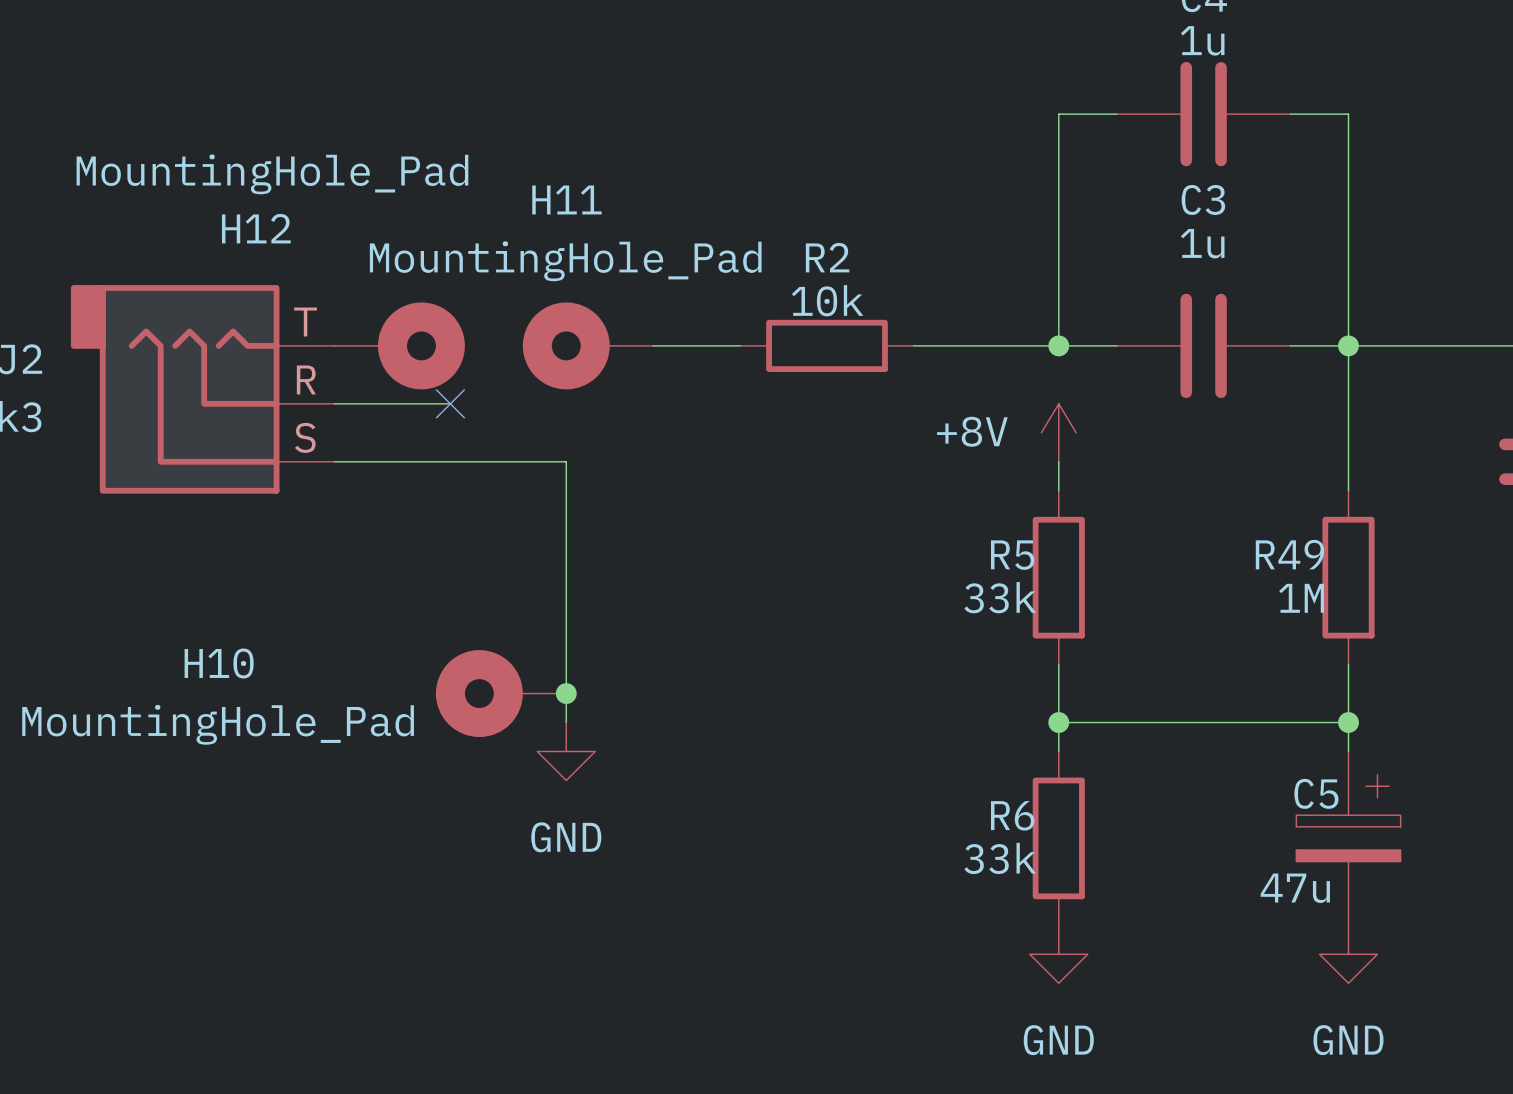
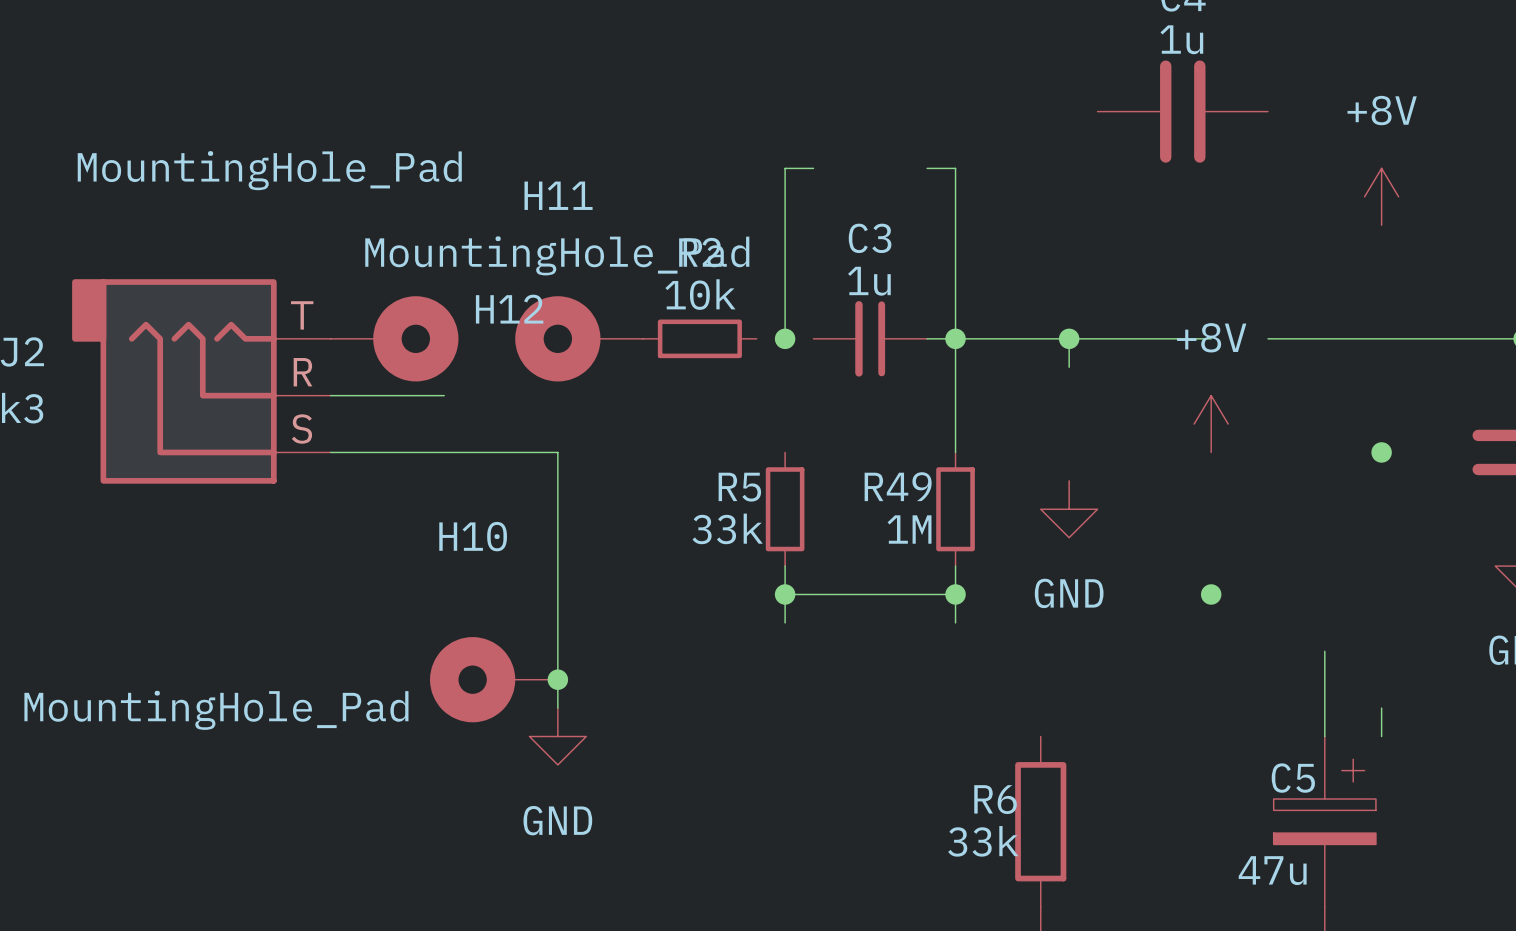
wire: (1116, 114) (1058, 114) (1058, 345) -> none
wire: (1290, 114) (1348, 114) (1348, 490) -> none
wire: none -> (813, 168) (785, 168) (785, 338)
wire: none -> (927, 168) (955, 168) (955, 452)
power symbol: none -> +8V (1381, 196)
H12 name position: H12 (256, 228) -> H12 (509, 309)
C3 symbol: [1116, 293, 1291, 399] -> [813, 301, 928, 377]
R2 symbol: [740, 319, 914, 372] -> [643, 319, 757, 359]
wire: (653, 345) (740, 345) -> none
junction: none -> (785, 338)
junction: none -> (955, 338)
junction position: (1058, 345) -> (1069, 338)
junction position: (1348, 345) -> (1381, 452)
no-connect mark: (450, 403) -> none
power symbol text position: +8V (972, 431) -> +8V (1211, 337)
power symbol position: +8V (1058, 432) -> +8V (1211, 424)
wire: (1058, 461) (1058, 490) -> (1069, 338) (1069, 367)
R5 symbol: [1032, 490, 1085, 665] -> [765, 452, 805, 567]
R49 symbol: [1322, 490, 1375, 665] -> [936, 452, 975, 567]
power symbol: none -> GND (1069, 509)
wire: none -> (785, 566) (785, 622)
wire: none -> (955, 566) (955, 622)
wire: none -> (785, 594) (955, 594)
junction: none -> (785, 594)
junction: none -> (955, 594)
junction: none -> (1211, 594)
H10 name position: H10 (219, 663) -> H10 (473, 536)
wire: (1058, 664) (1058, 751) -> none
wire: (1058, 722) (1348, 722) -> none
junction: (1058, 722) -> none
junction: (1348, 722) -> none
wire: none -> (1381, 708) (1381, 736)

